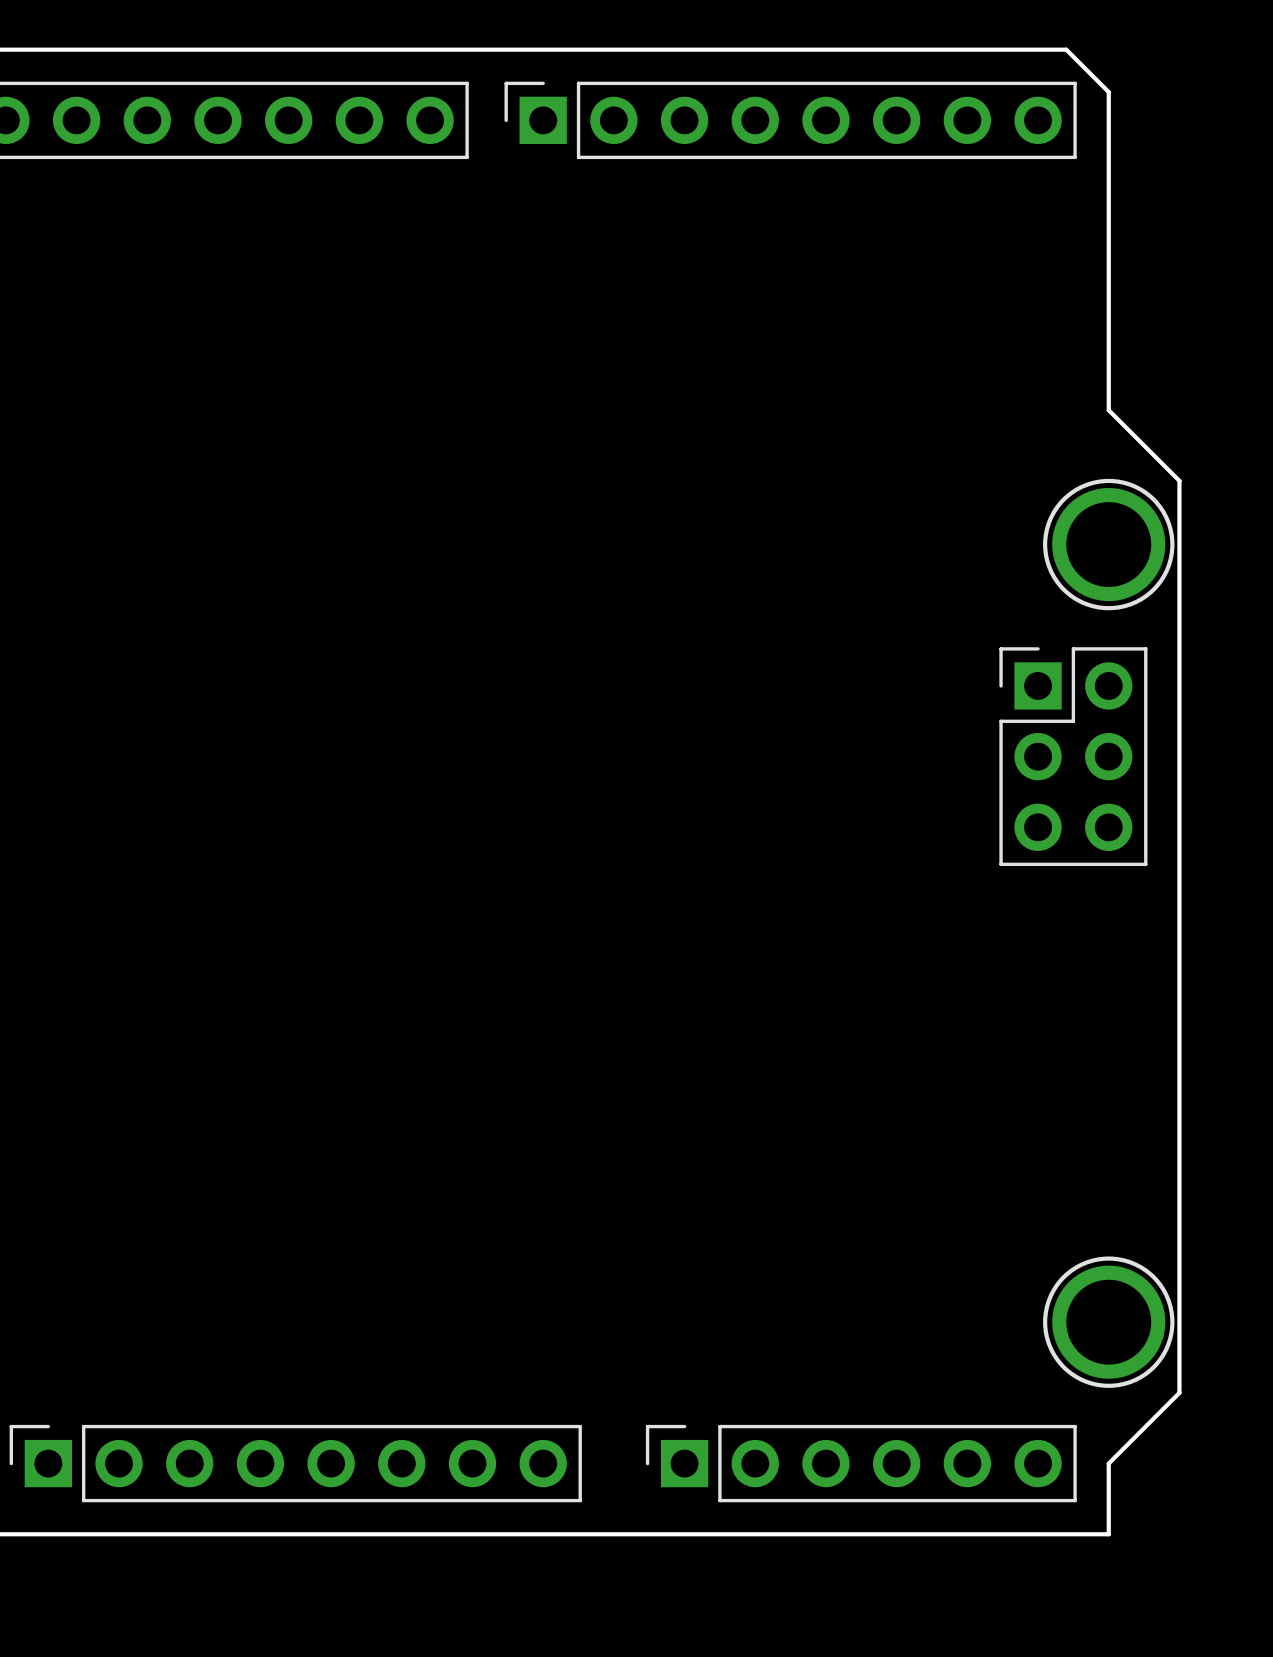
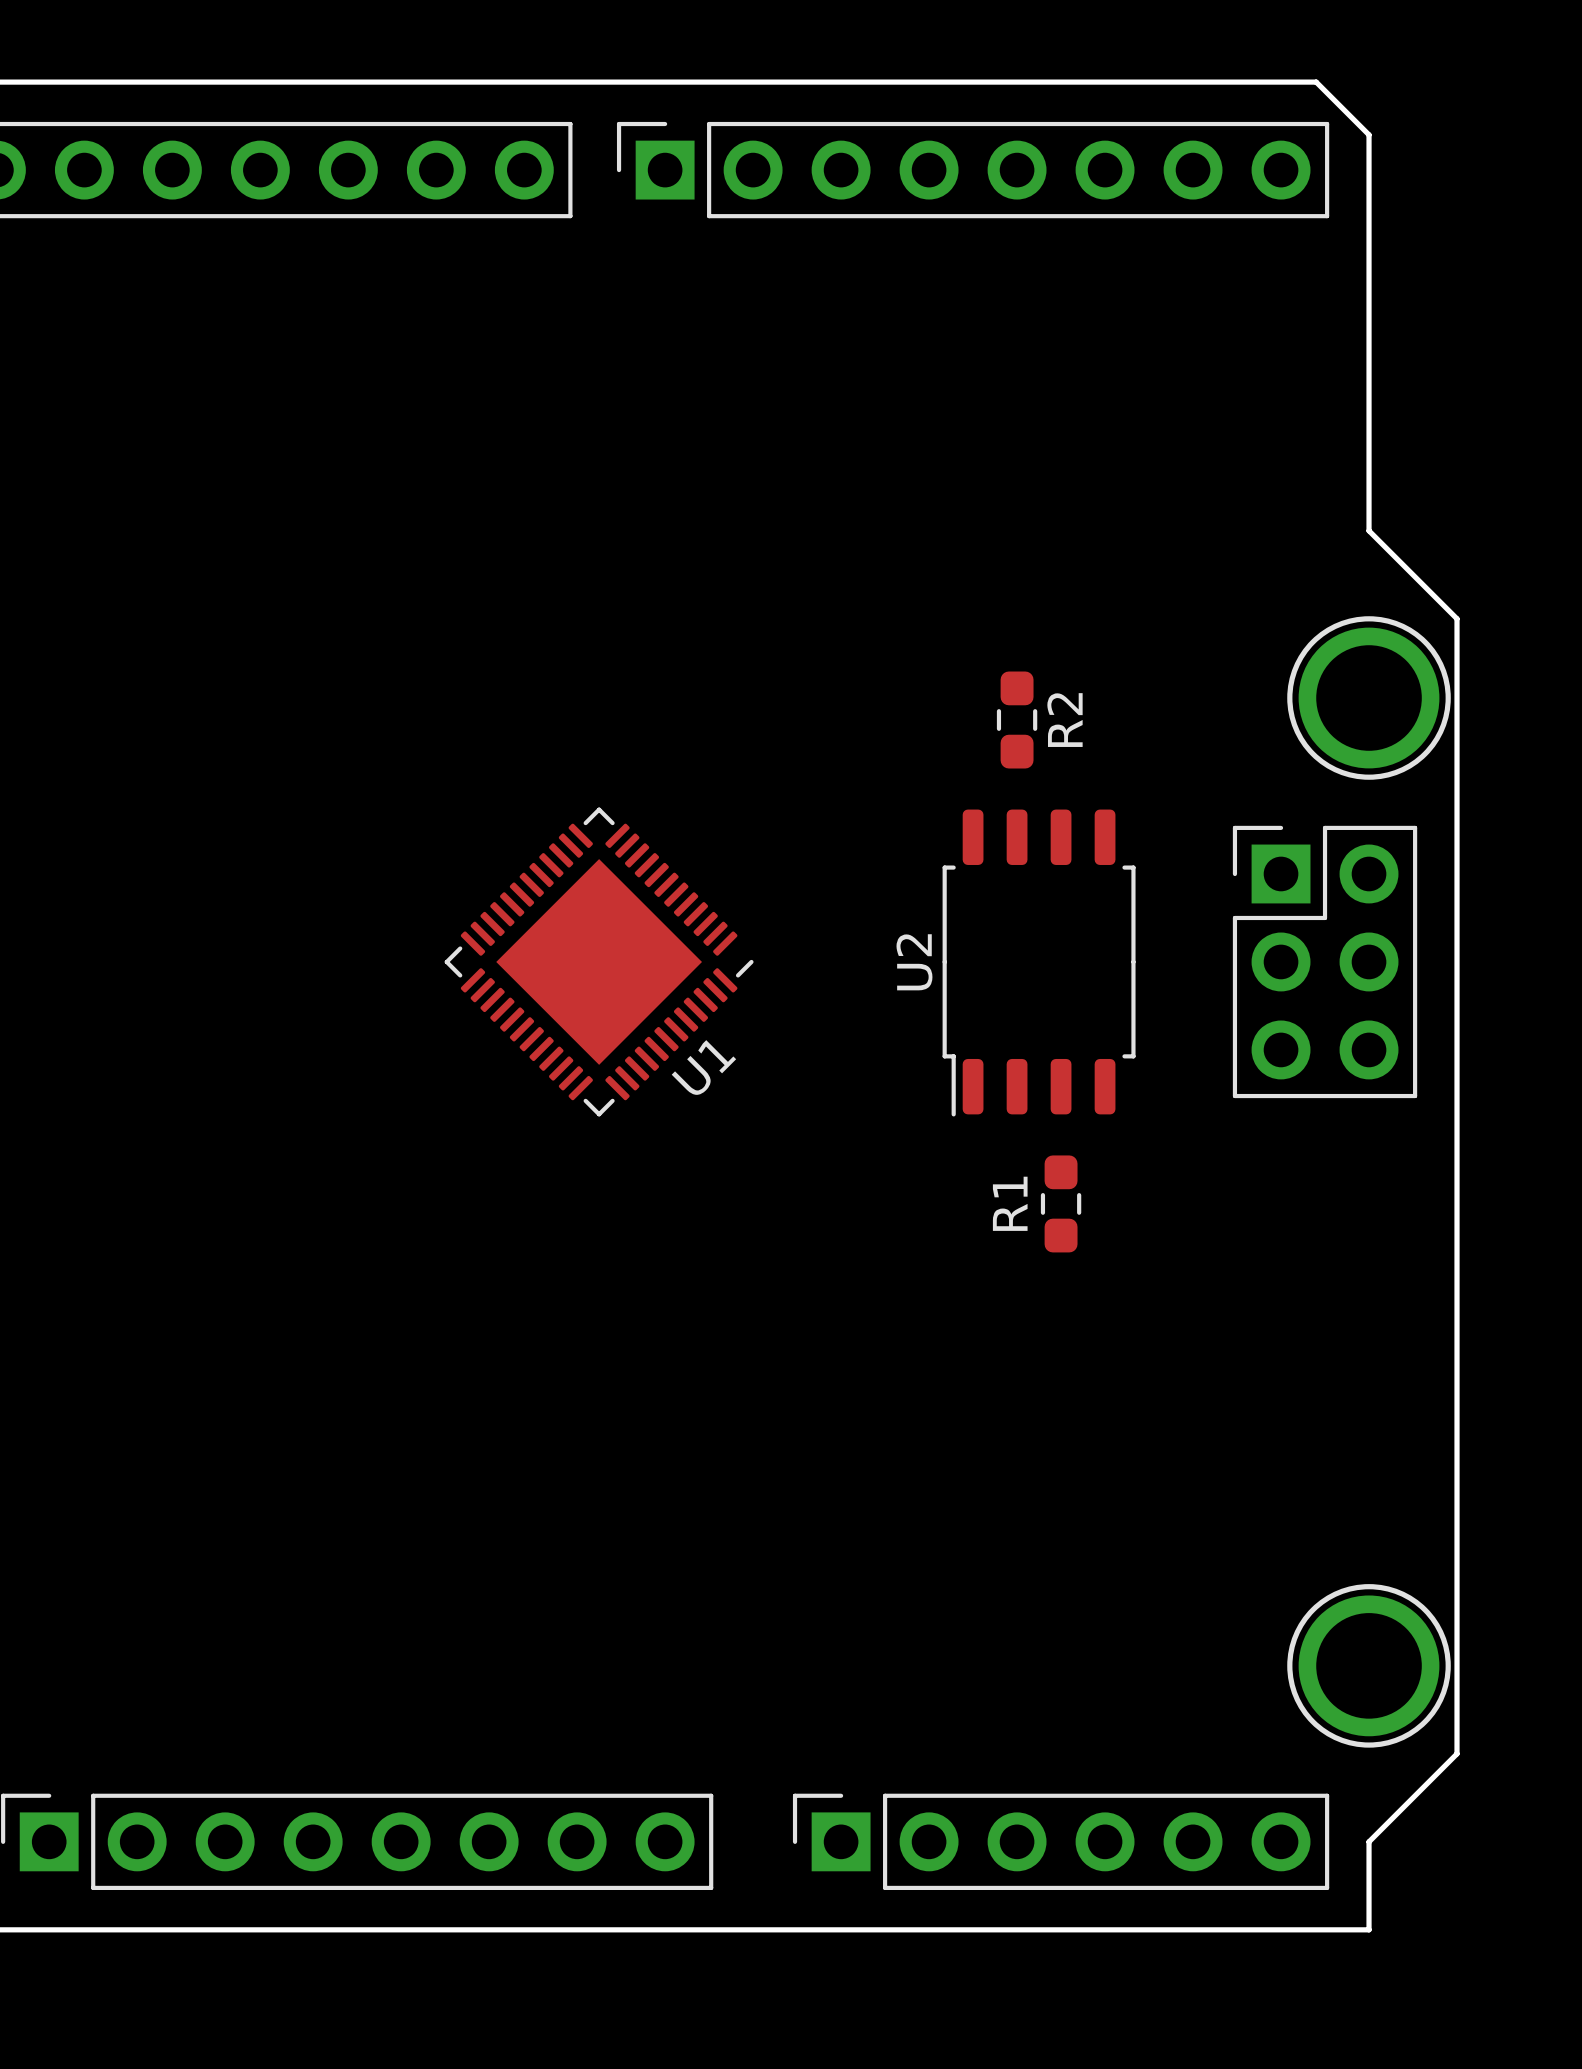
R2: none -> (1017, 720)
U1: none -> (599, 961)
U2: none -> (1039, 963)
R1: none -> (1061, 1203)

